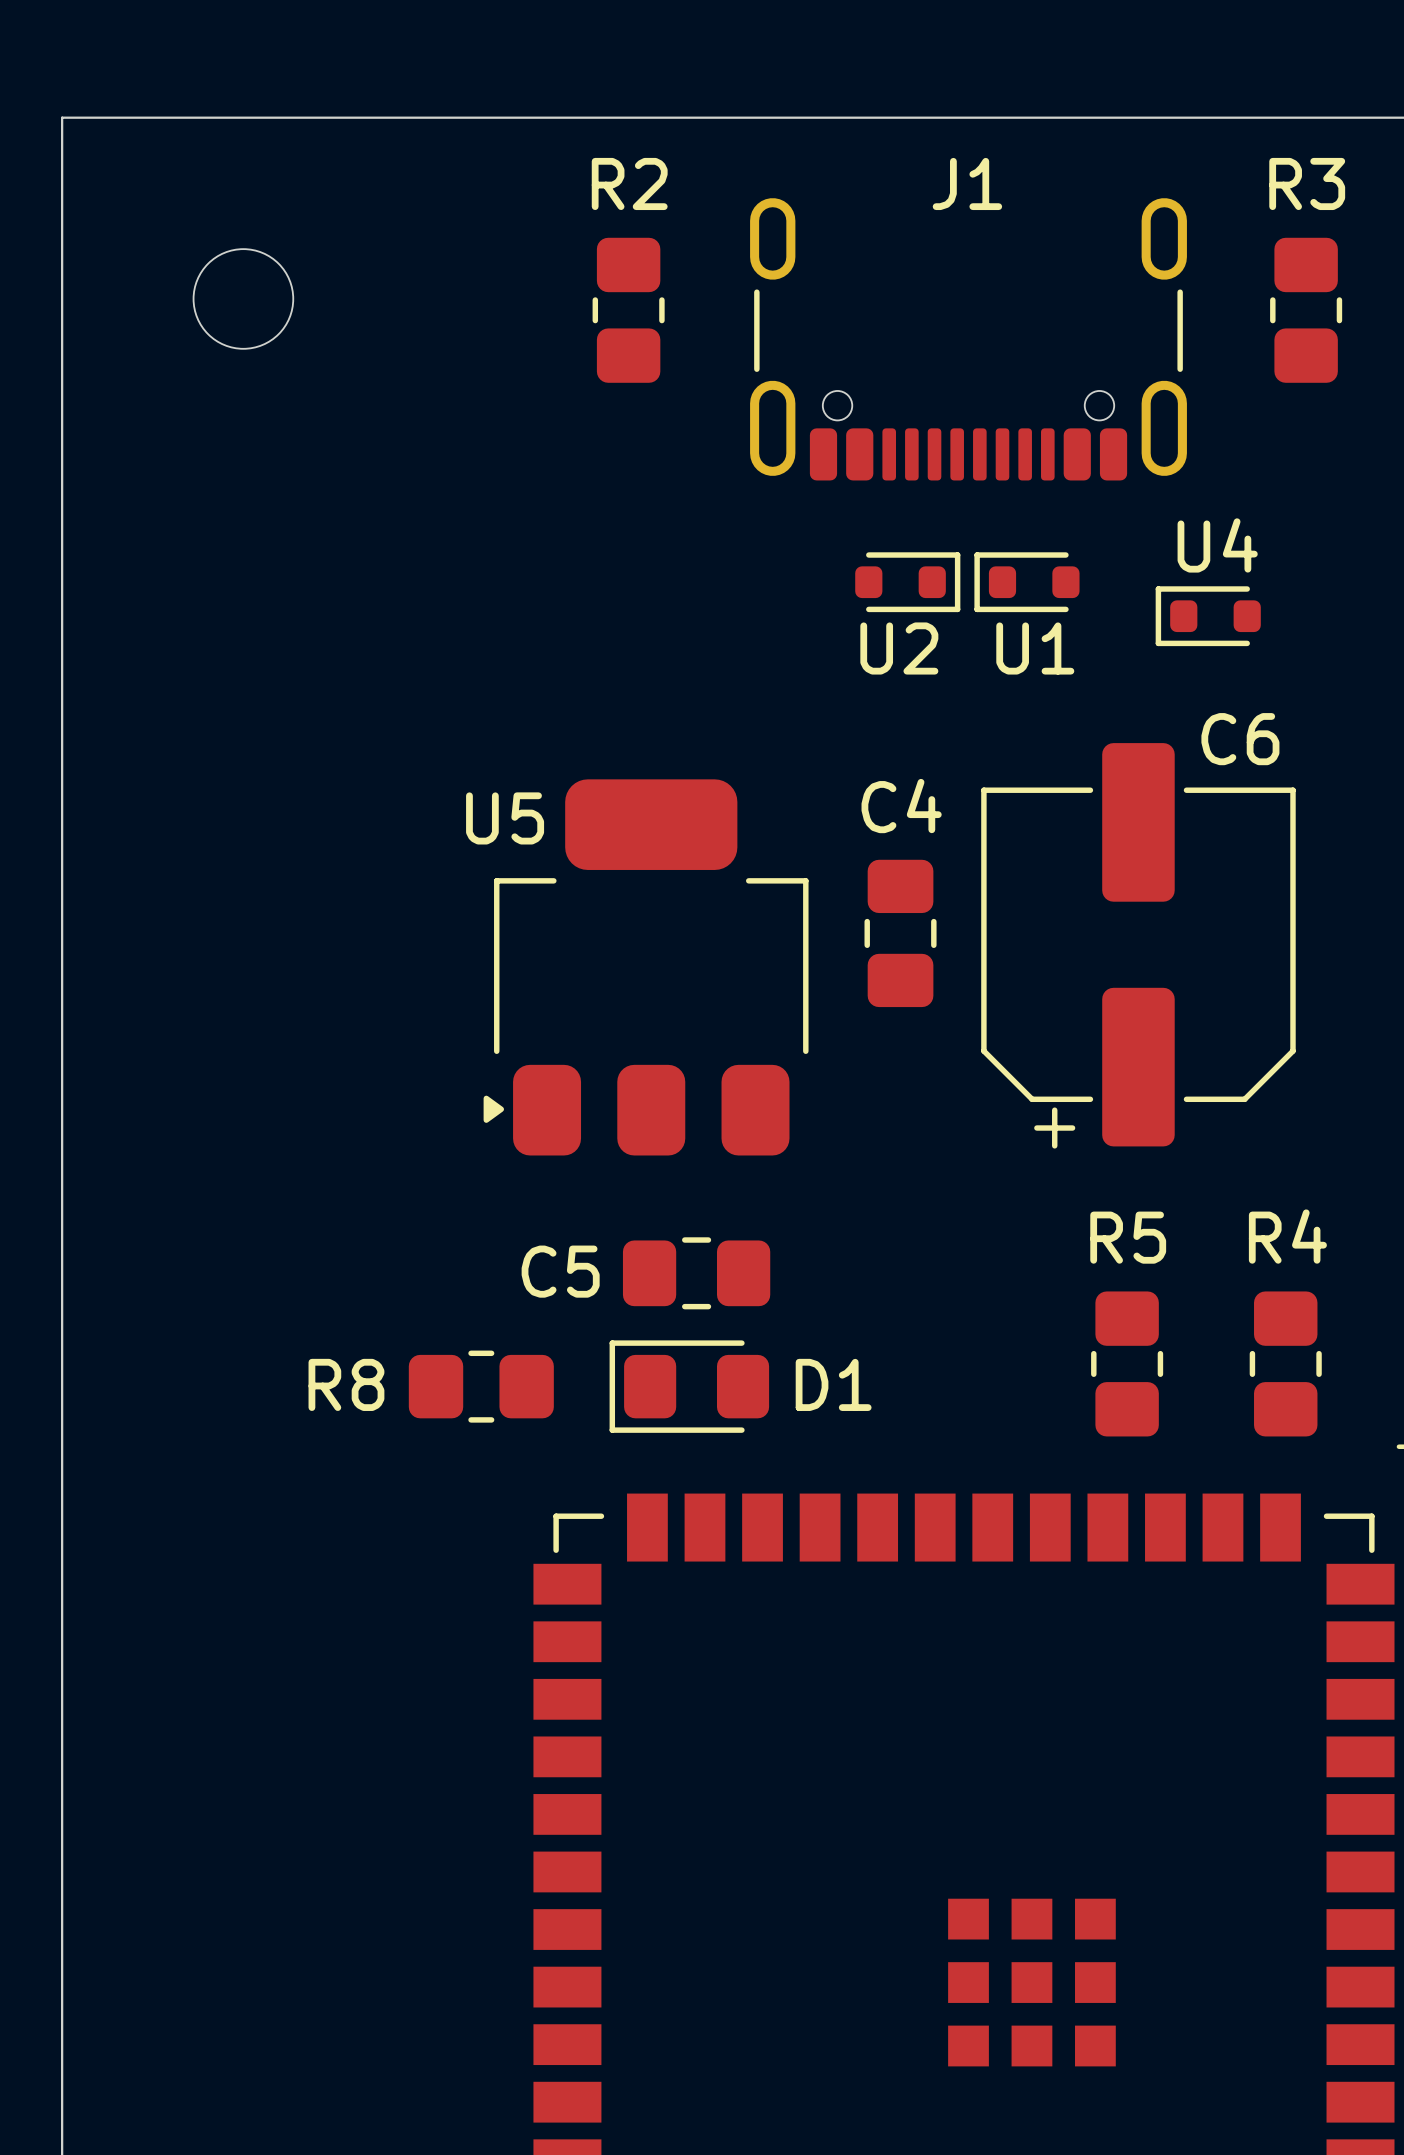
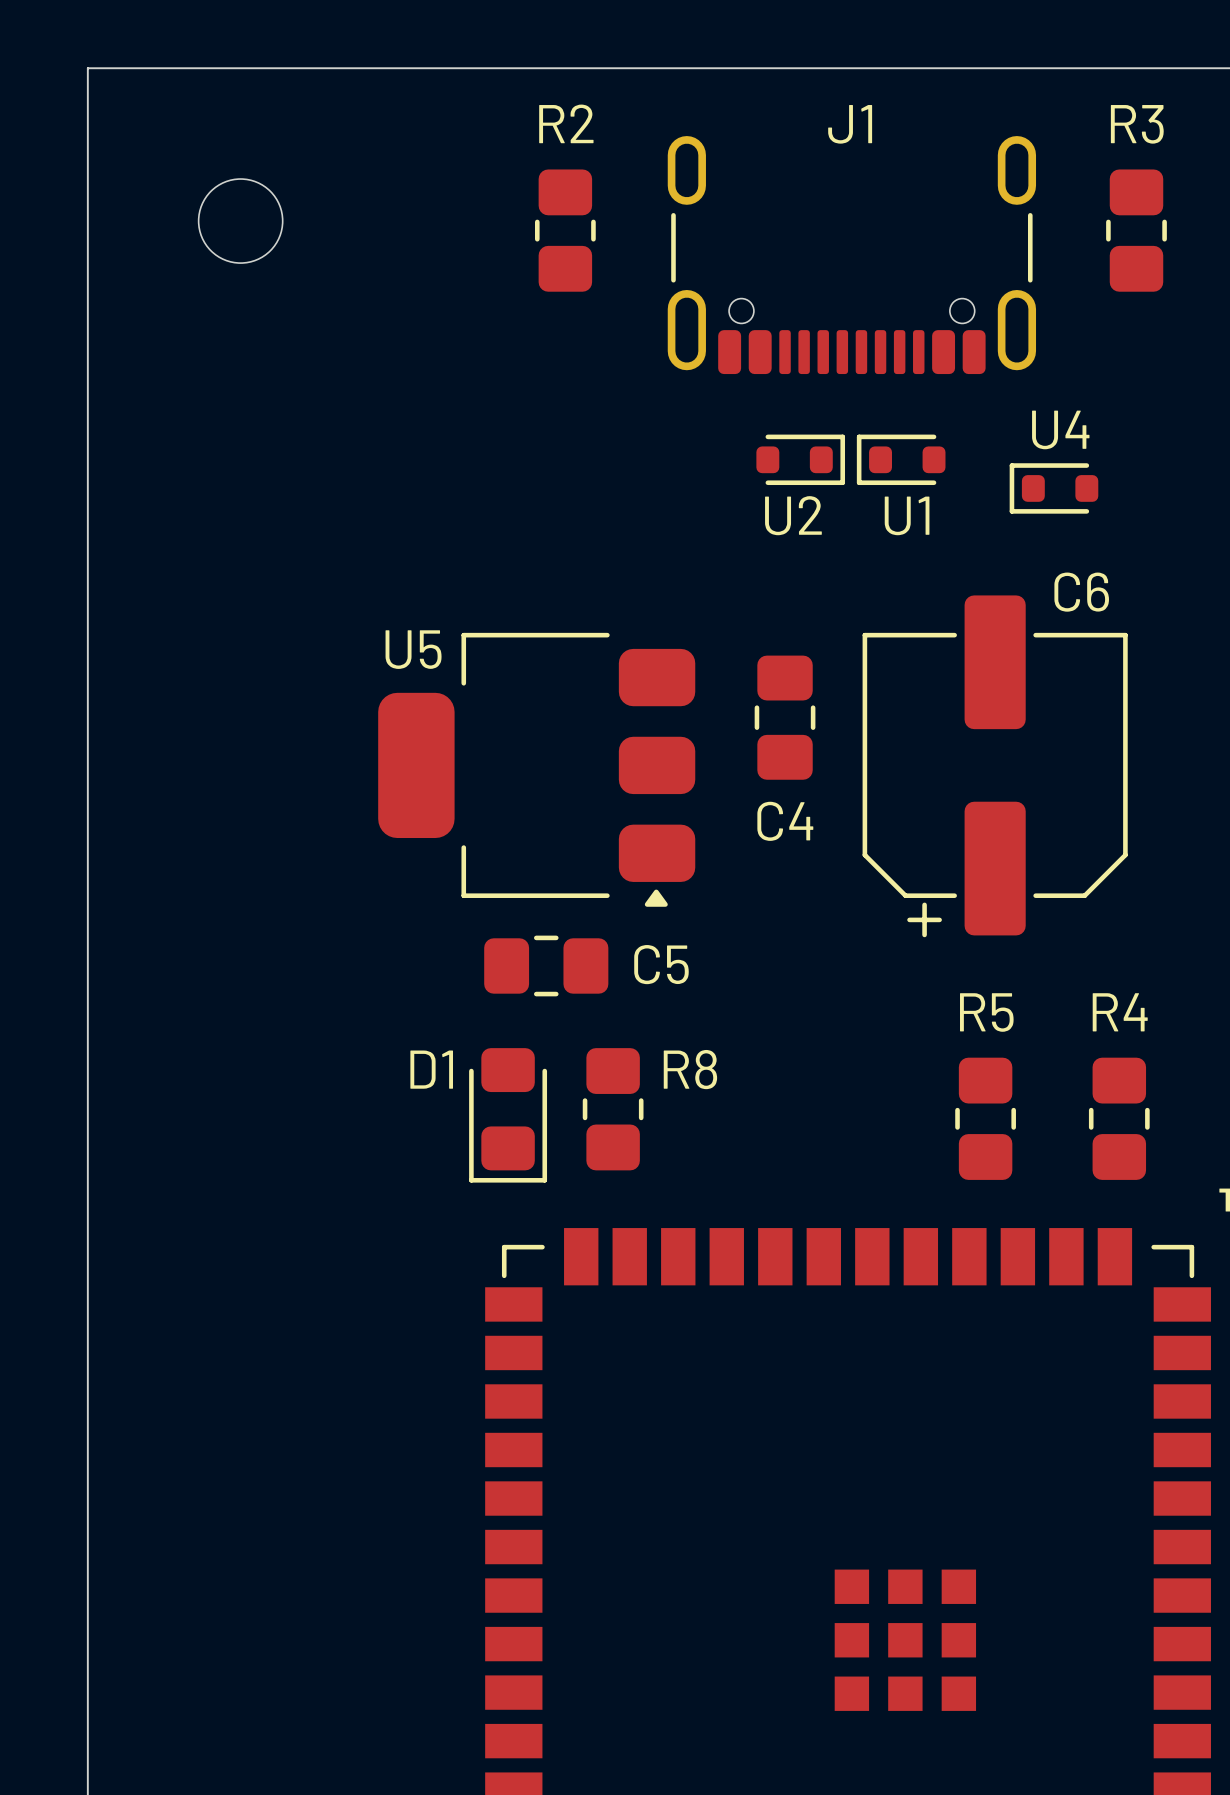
C4 name position: C4 (901, 806) -> C4 (785, 821)
C4 position: (900, 933) -> (785, 717)
U5 rotation: 0° (646, 967) -> 90° counterclockwise (536, 769)
C5 name position: C5 (560, 1271) -> C5 (661, 964)
C5 position: (696, 1273) -> (546, 965)
R8 name position: R8 (346, 1384) -> R8 (690, 1069)
D1 name position: D1 (833, 1384) -> D1 (431, 1069)
R8 rotation: 0° (481, 1386) -> 90° clockwise (613, 1109)
R8 position: (481, 1386) -> (613, 1109)
D1 rotation: 0° (689, 1386) -> 90° counterclockwise (508, 1115)
D1 position: (689, 1386) -> (508, 1115)

